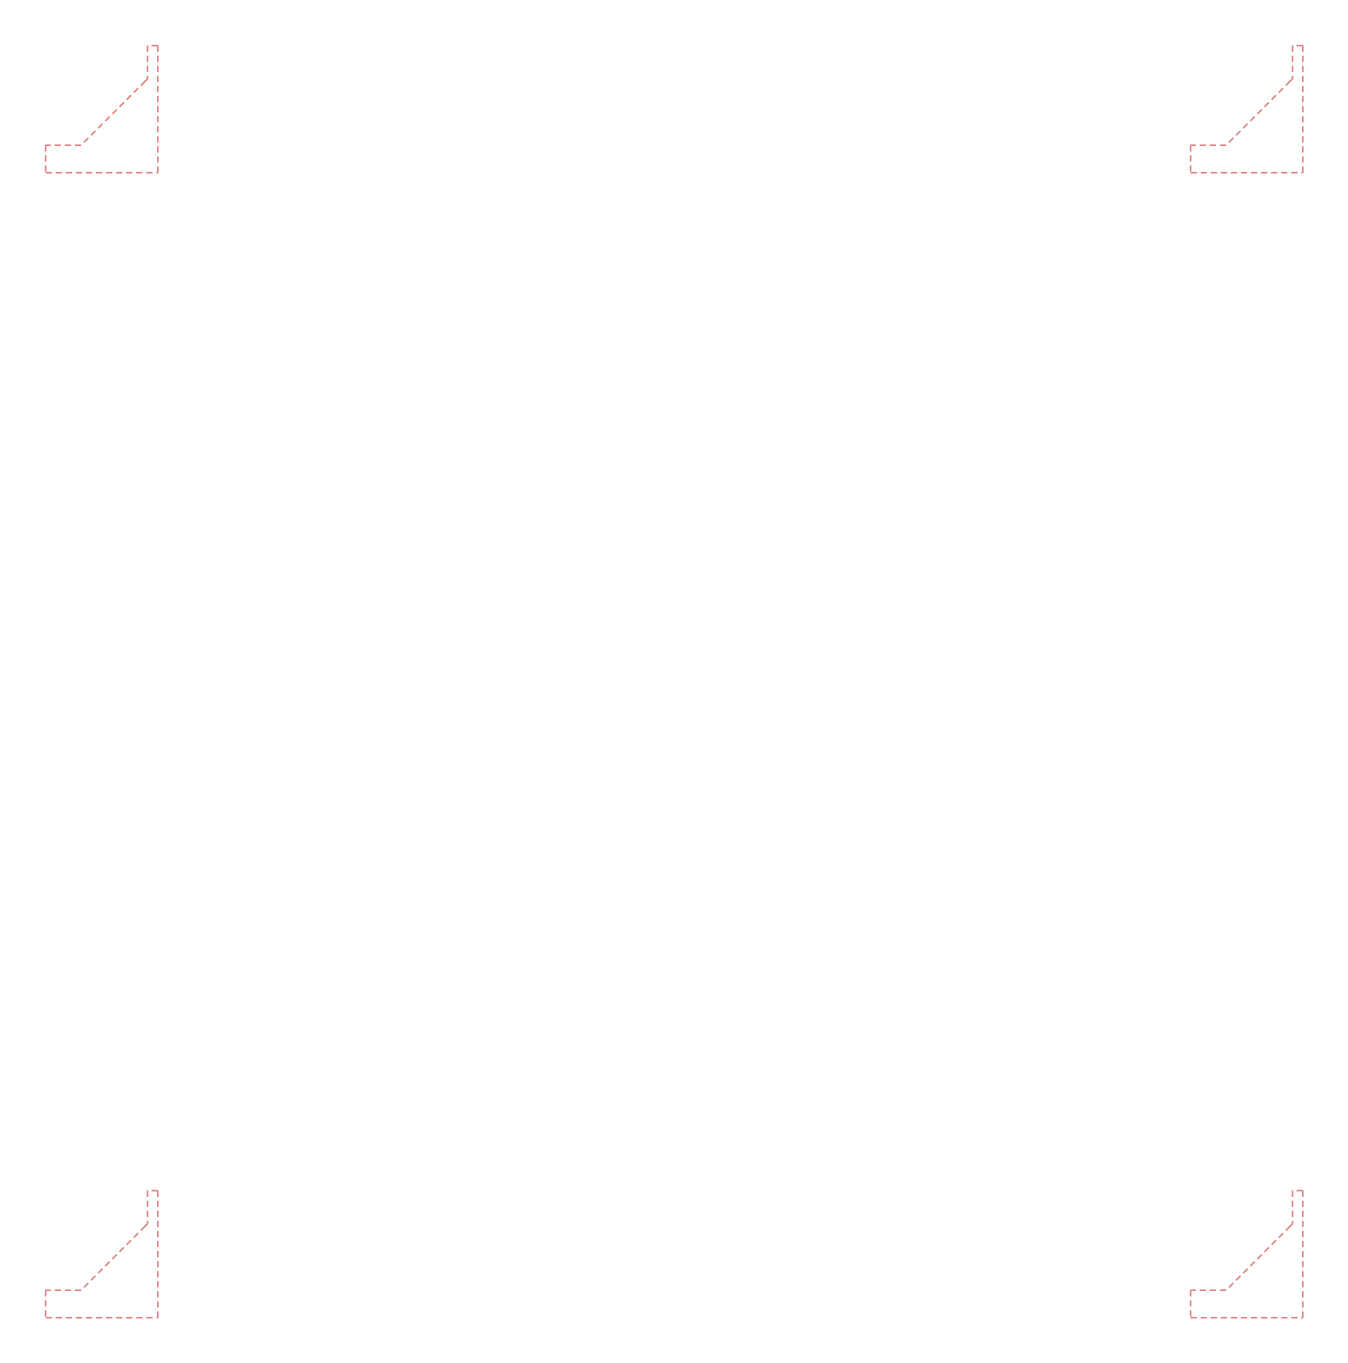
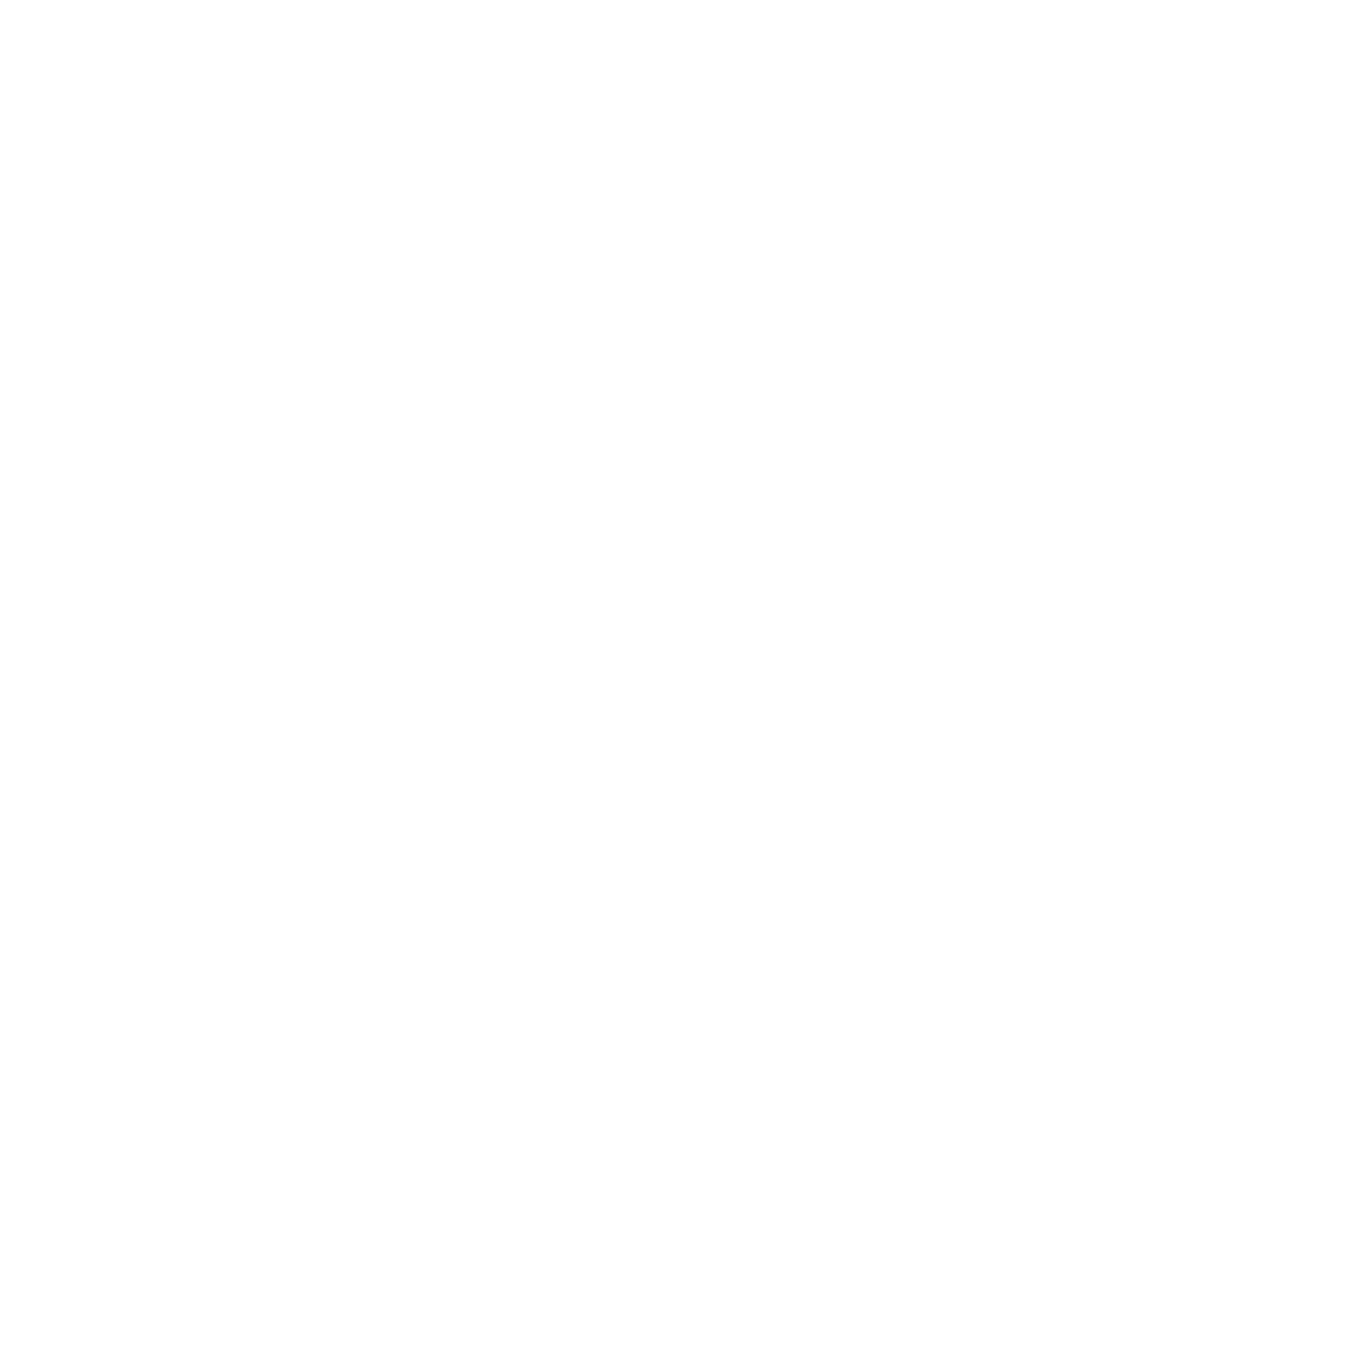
zone outline: (147, 45) (147, 78) (81, 145) (45, 145) (45, 172) (157, 172) (157, 45) (147, 45) -> none
zone outline: (1292, 45) (1302, 45) (1302, 172) (1190, 172) (1190, 145) (1226, 145) (1292, 78) (1292, 45) -> none
zone outline: (147, 1190) (147, 1223) (81, 1290) (45, 1290) (45, 1317) (157, 1317) (157, 1190) (147, 1190) -> none
zone outline: (1292, 1190) (1292, 1223) (1226, 1290) (1190, 1290) (1190, 1317) (1302, 1317) (1302, 1190) (1292, 1190) -> none

